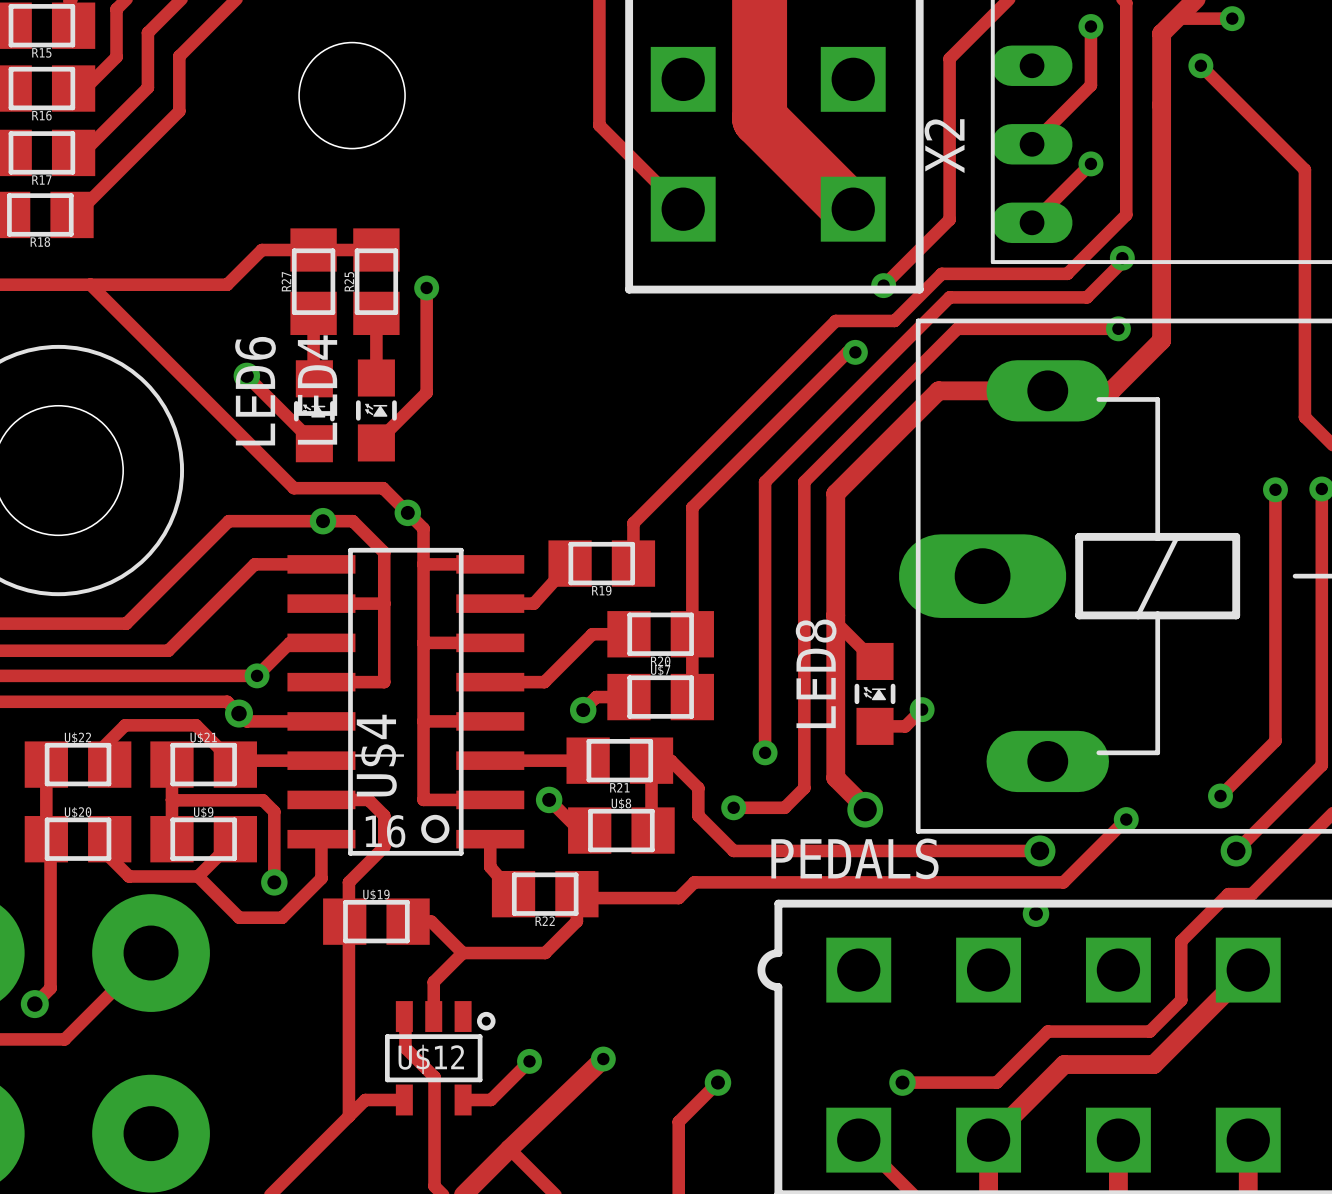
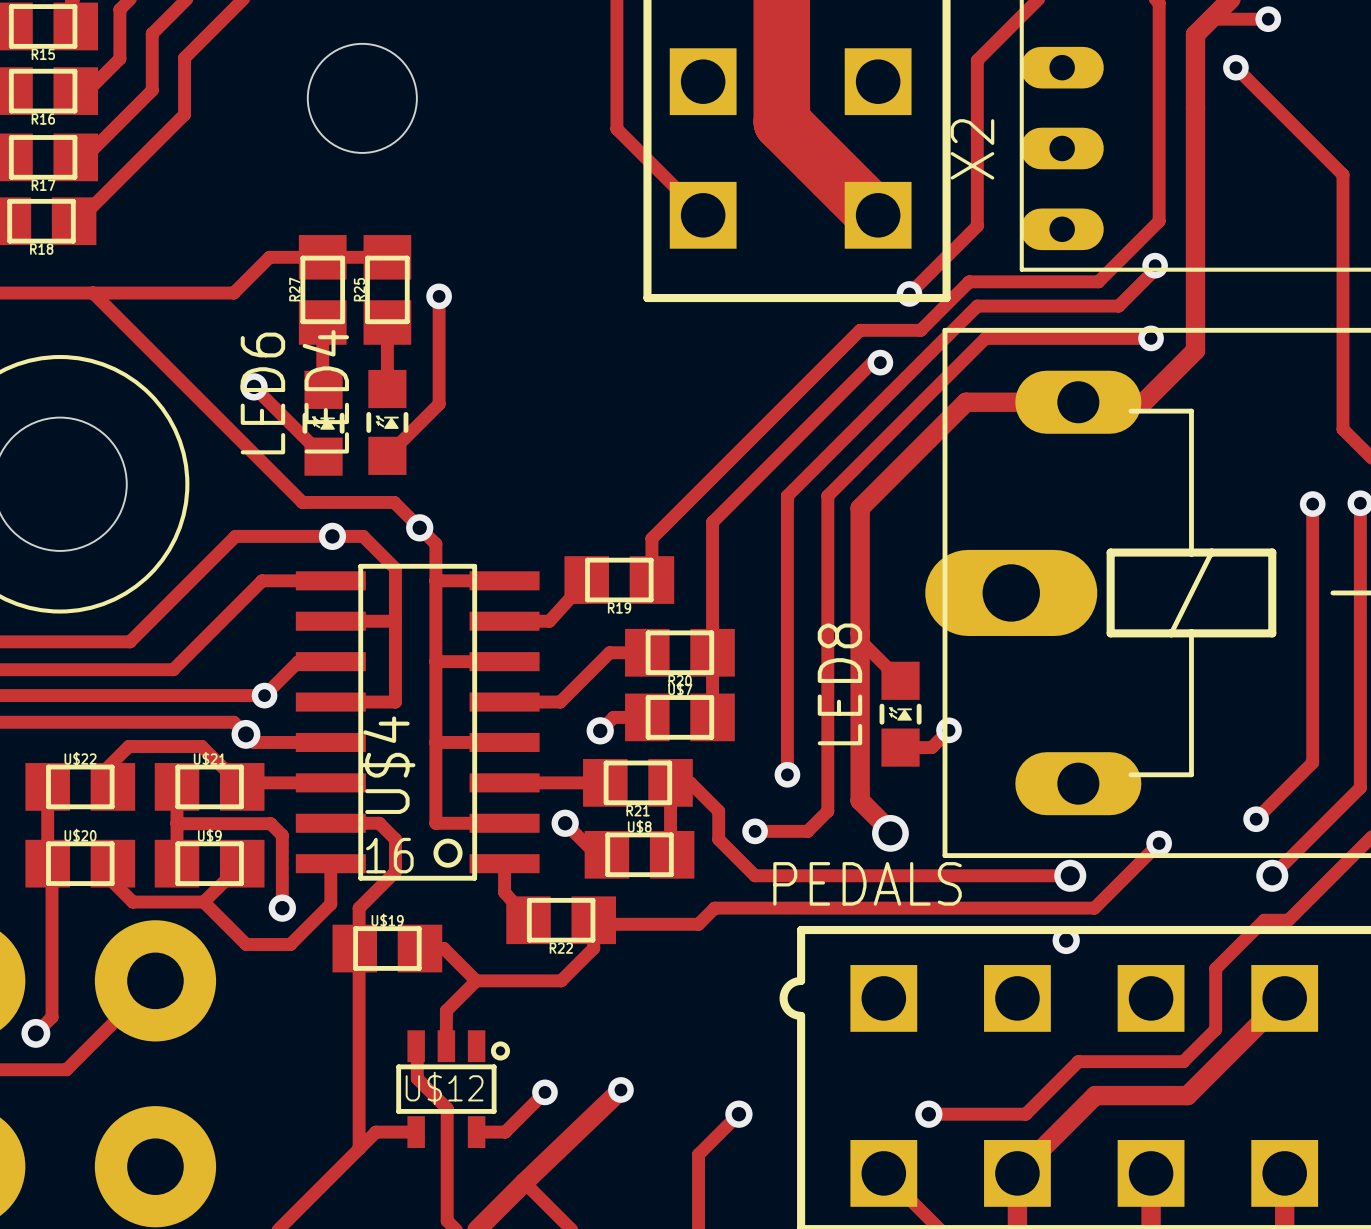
track: (1090, 26) (1090, 85) (1032, 144) -> none
via: (1090, 26) -> none
track: (1090, 163) (1032, 222) -> none
via: (1090, 163) -> none

